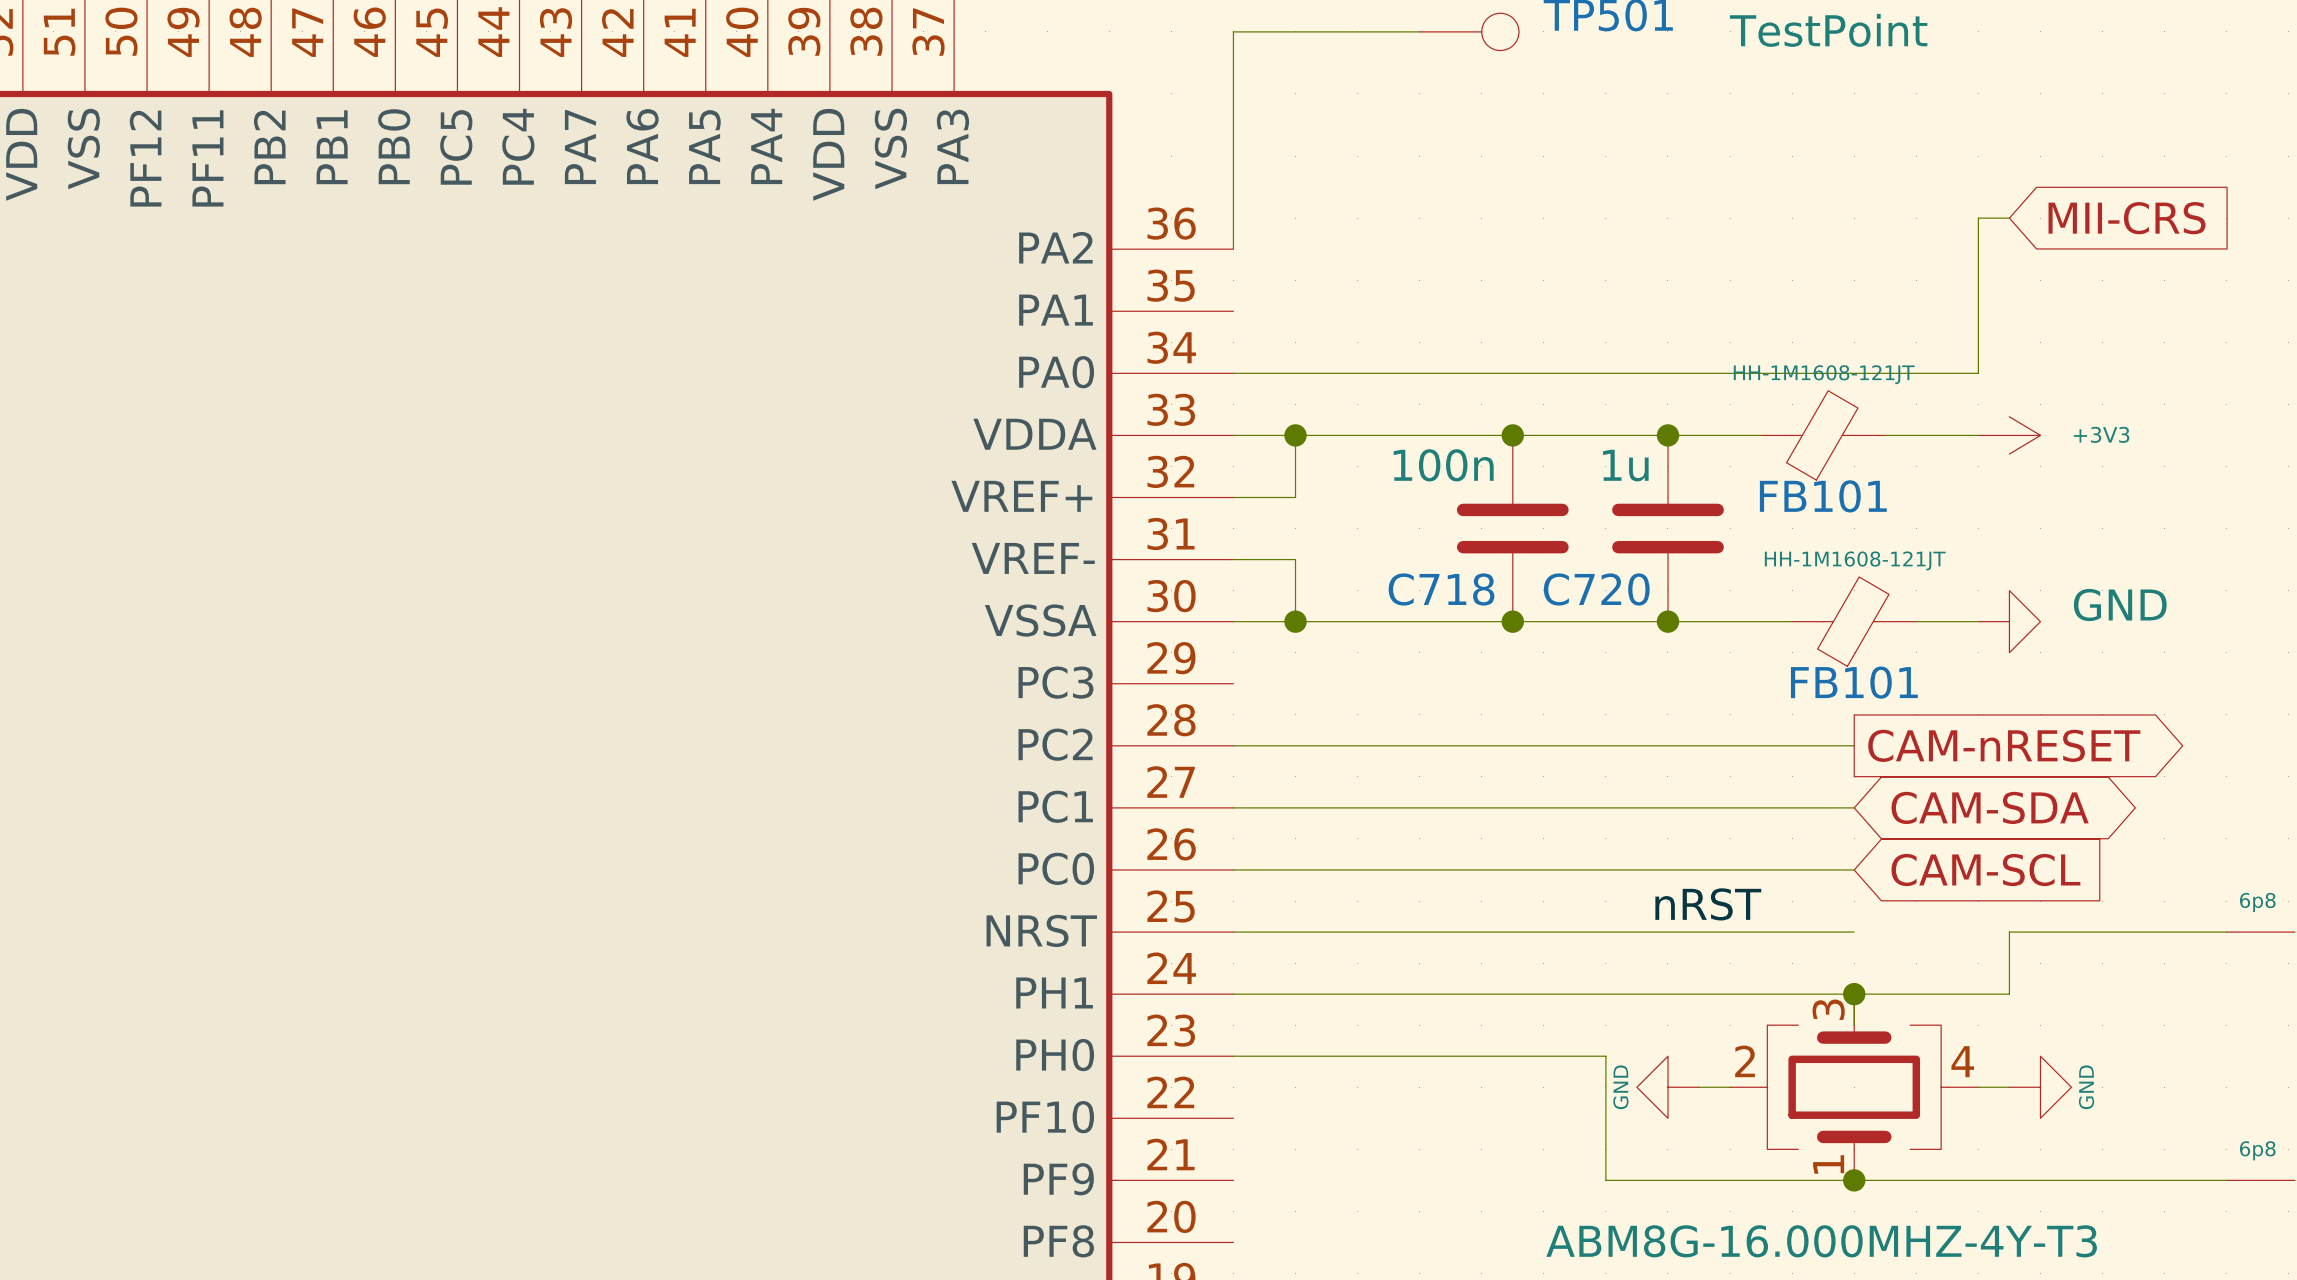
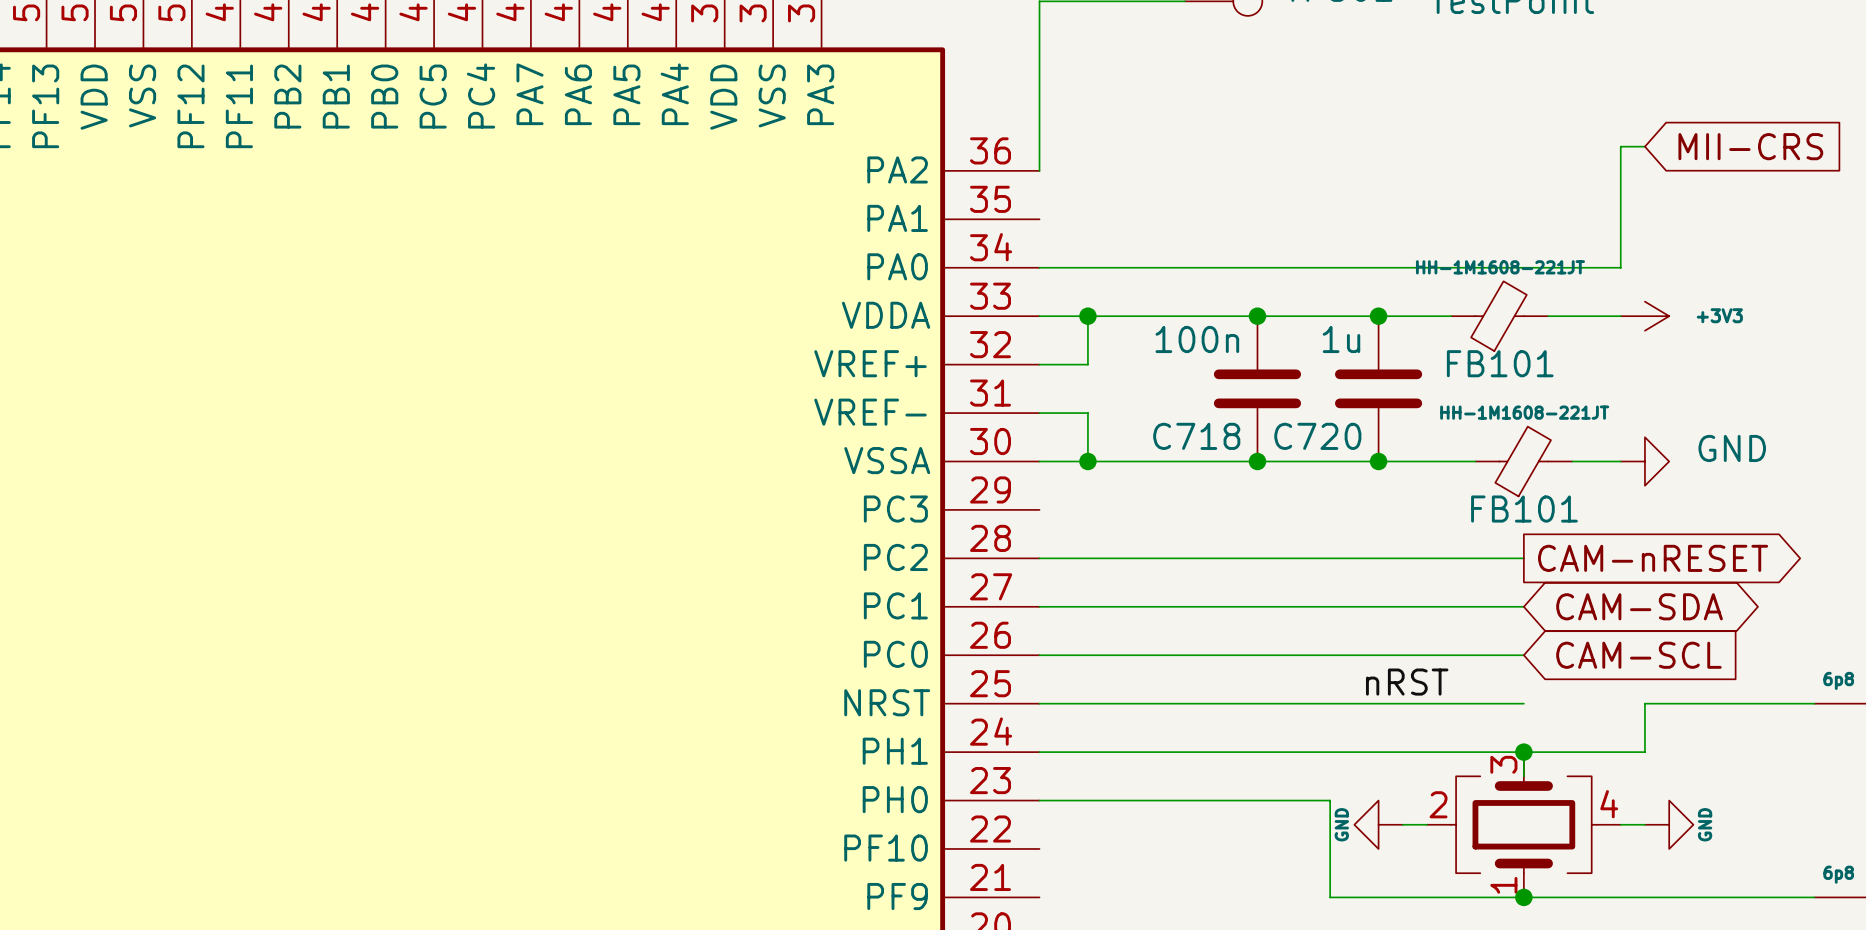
FB101 value: HH-1M1608-121JT (1824, 374) -> HH-1M1608-221JT (1500, 267)
FB101 value: HH-1M1608-121JT (1855, 560) -> HH-1M1608-221JT (1524, 412)

